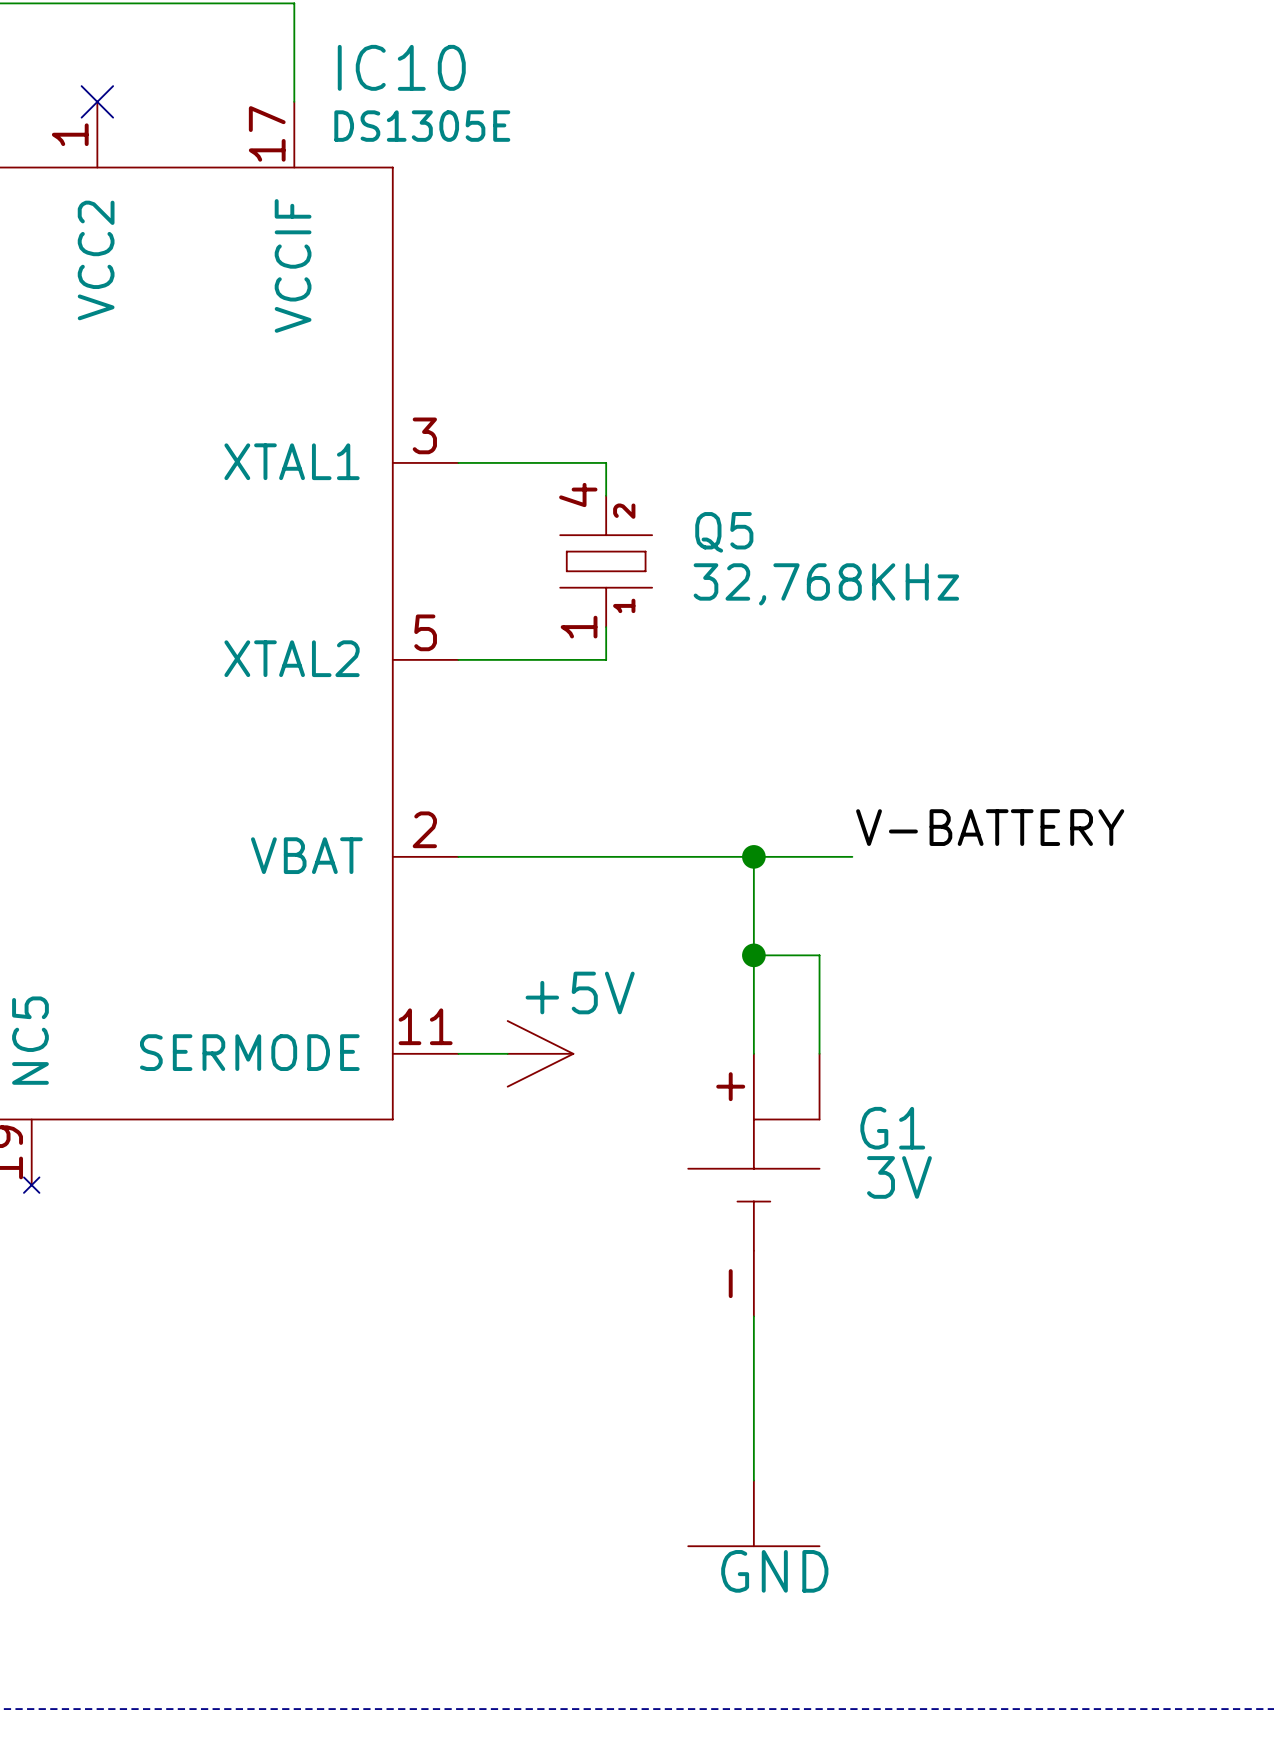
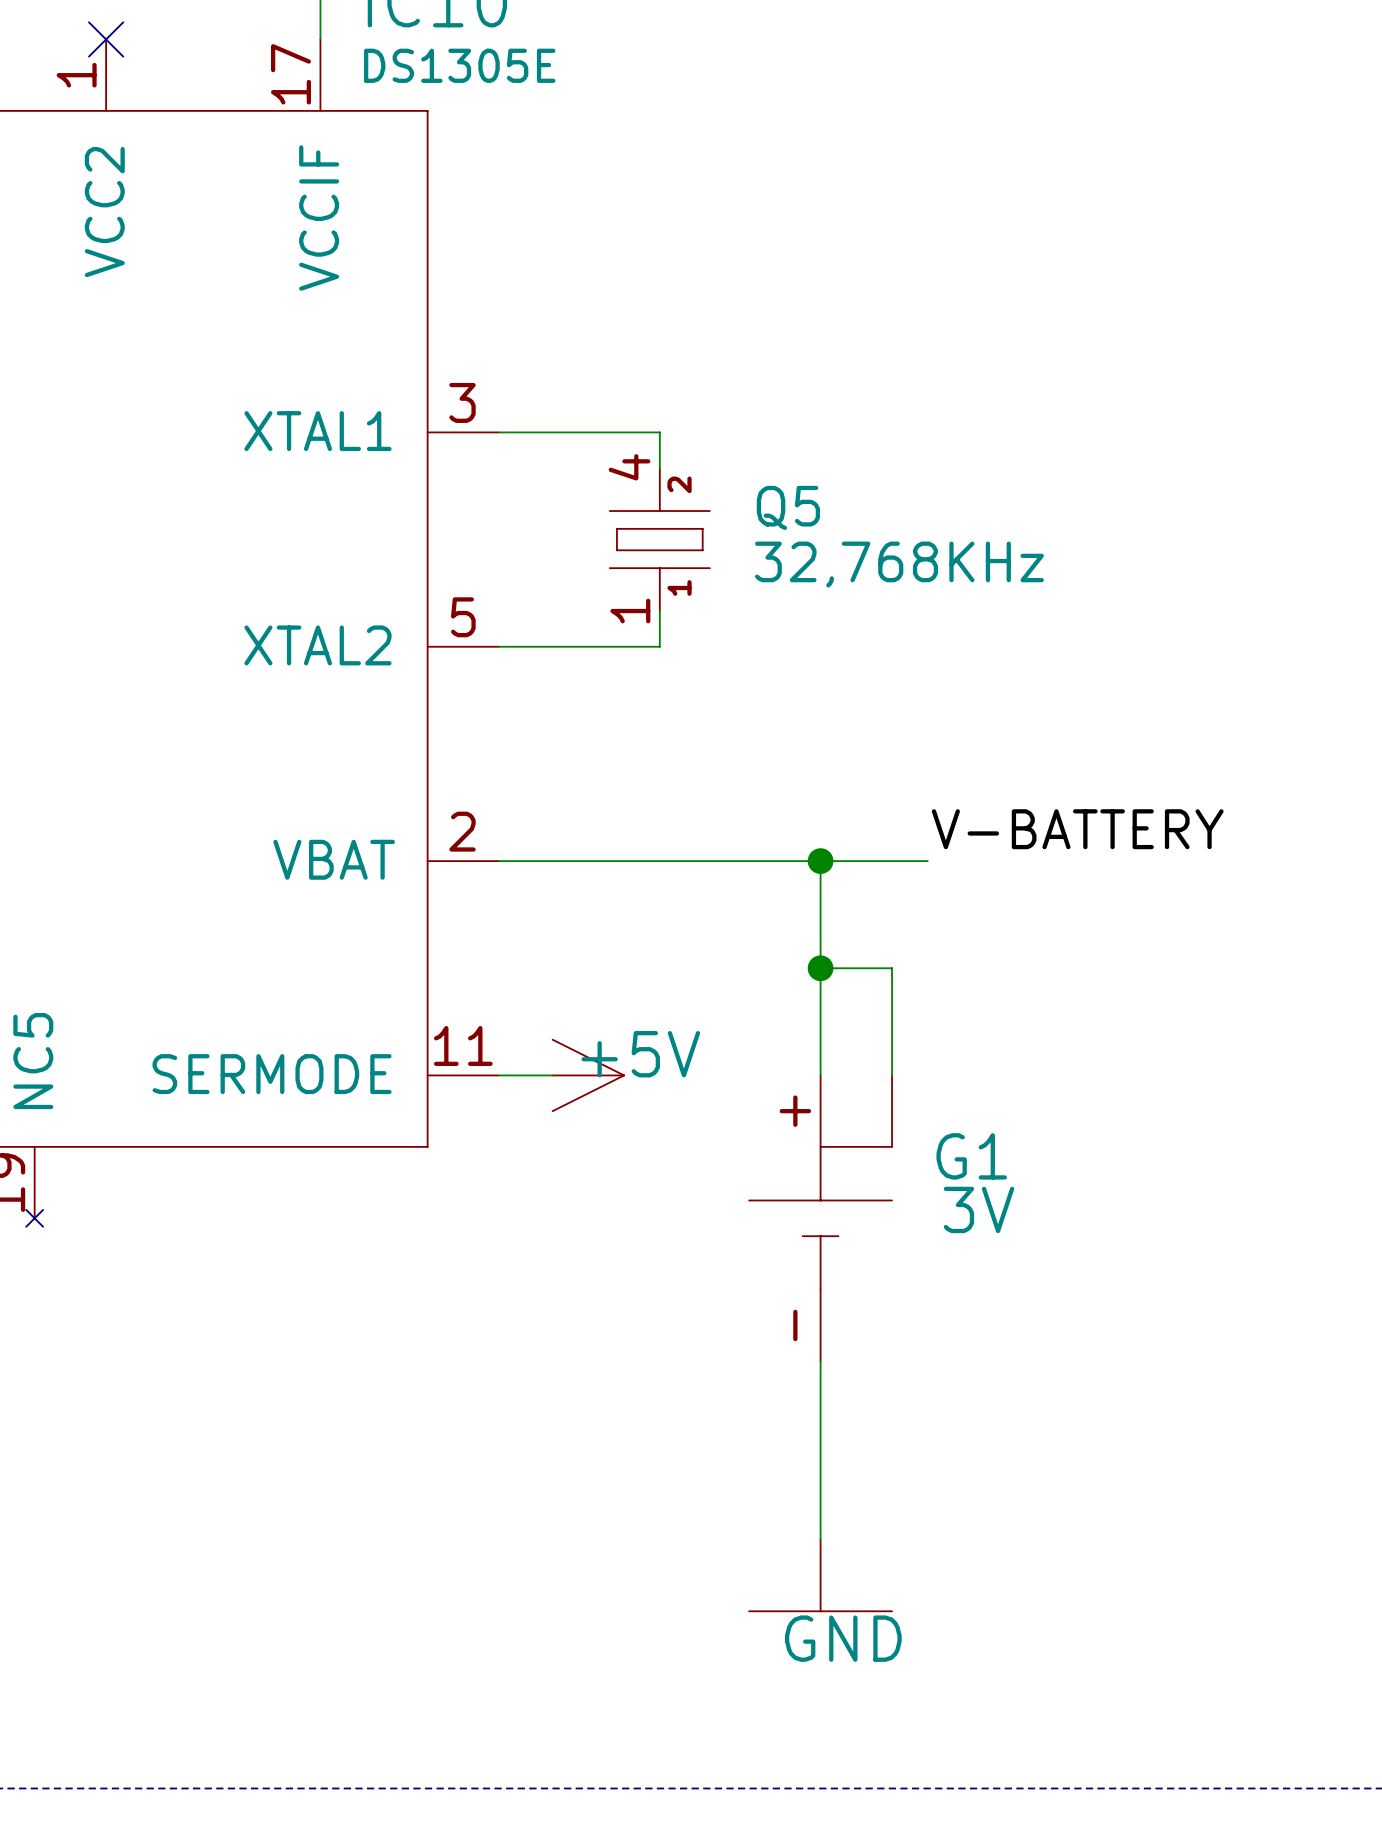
power symbol text position: +5V (580, 992) -> +5V (640, 1054)

